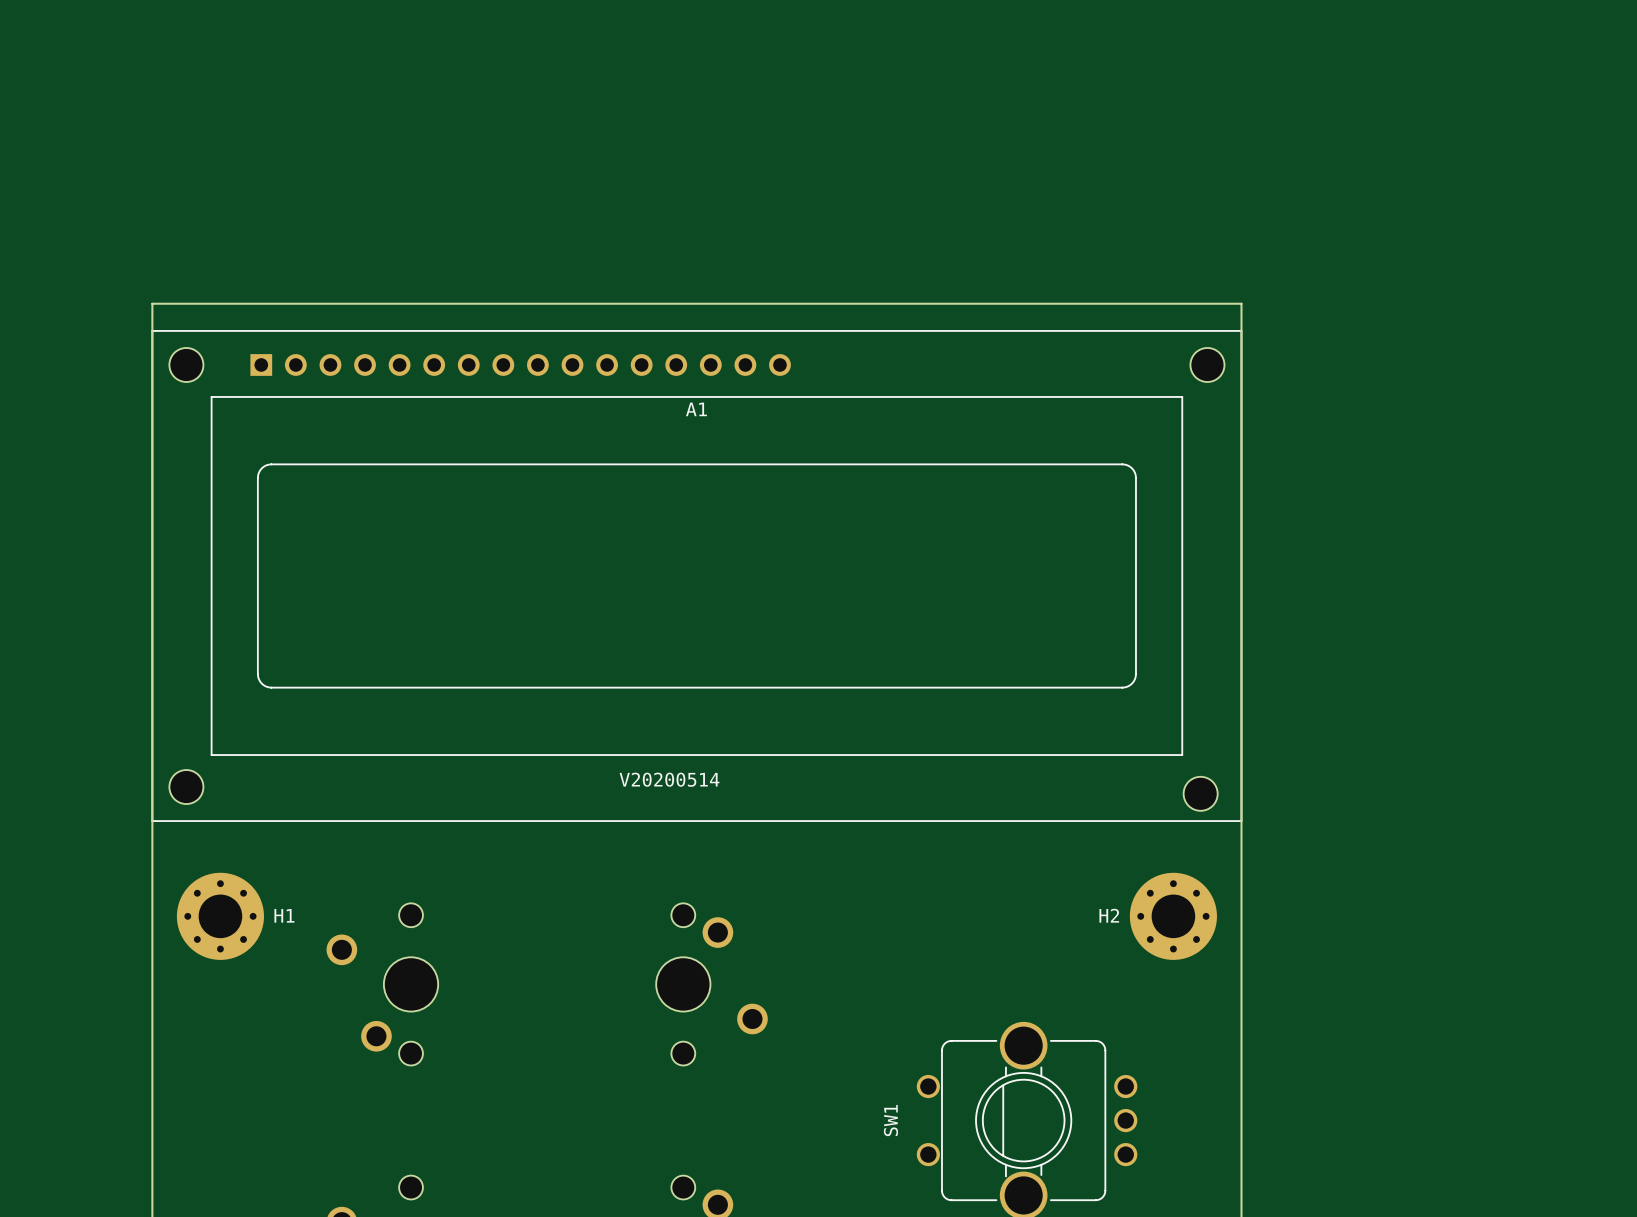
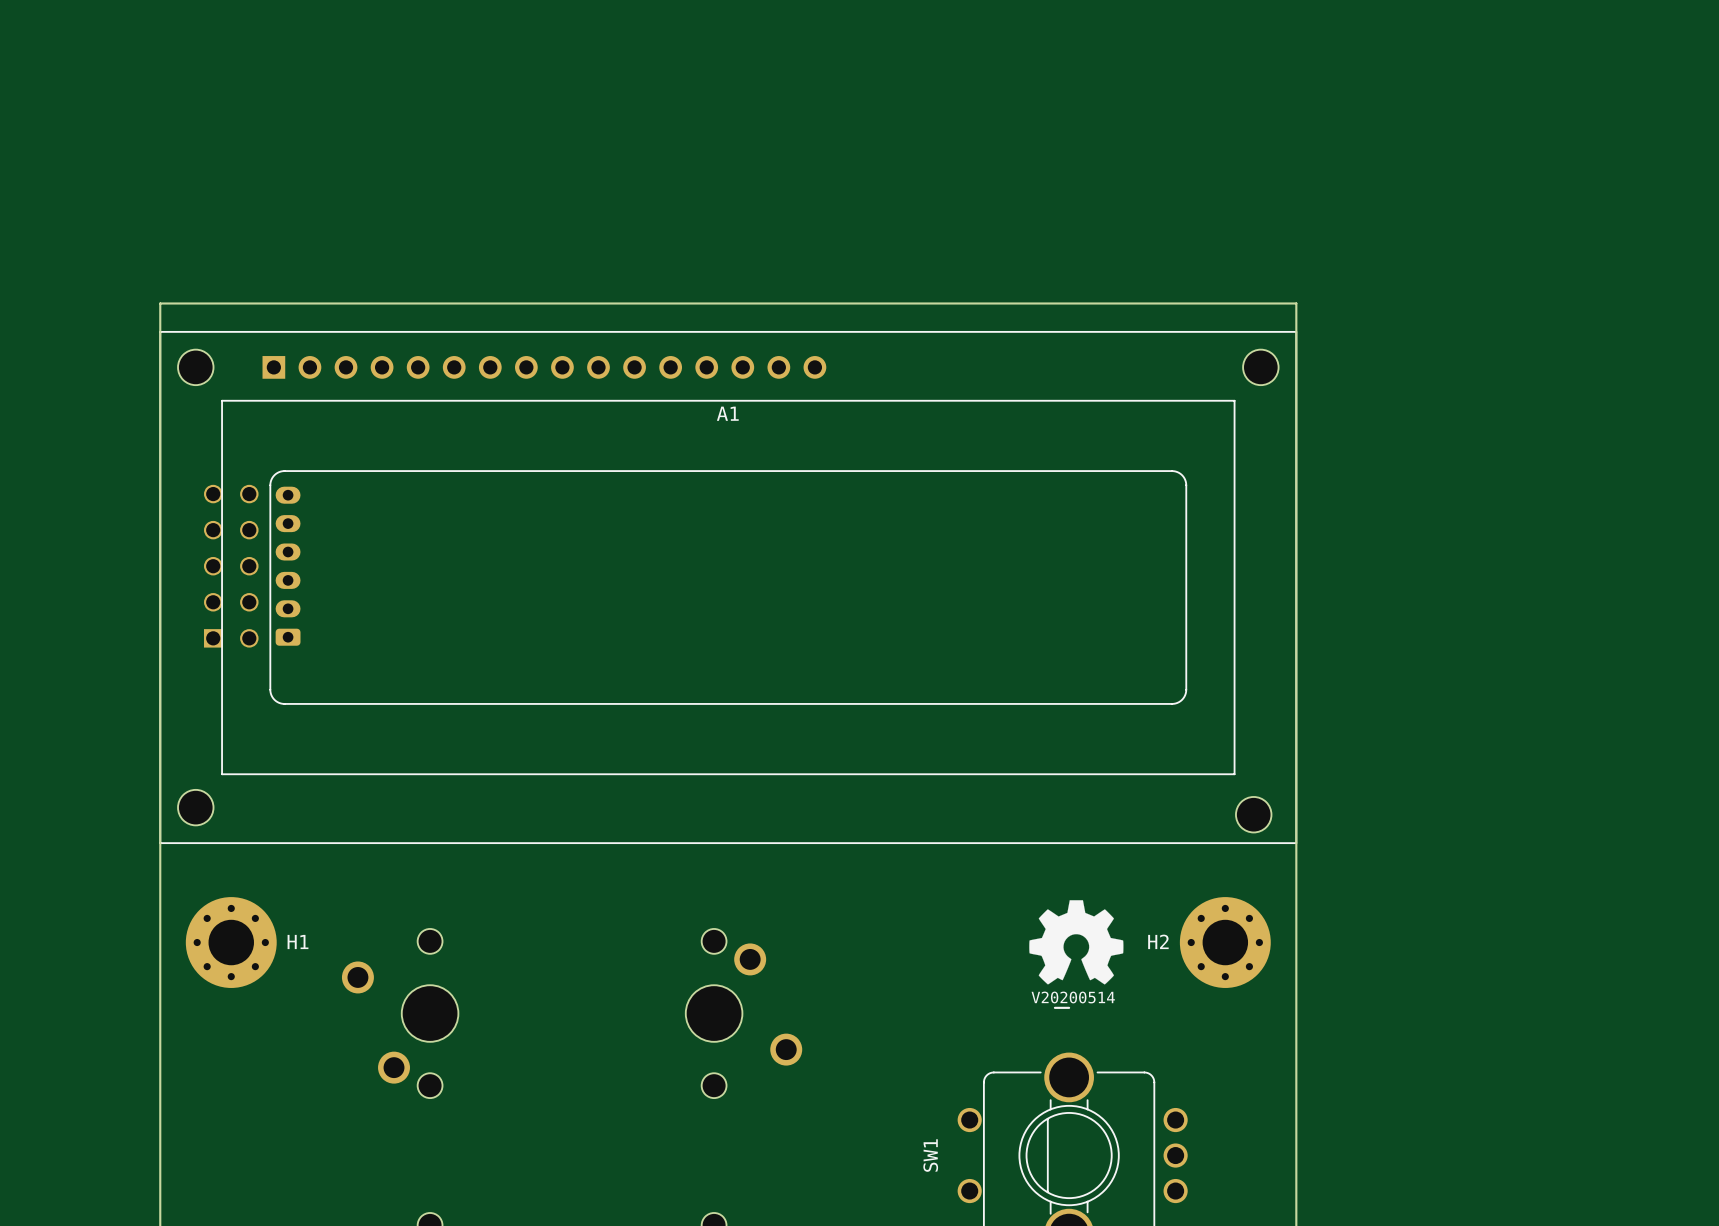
part: none -> (231, 566)
part: none -> (288, 566)
drawing: [619, 772, 720, 787] -> none
drawing: none -> [1029, 900, 1124, 1009]

